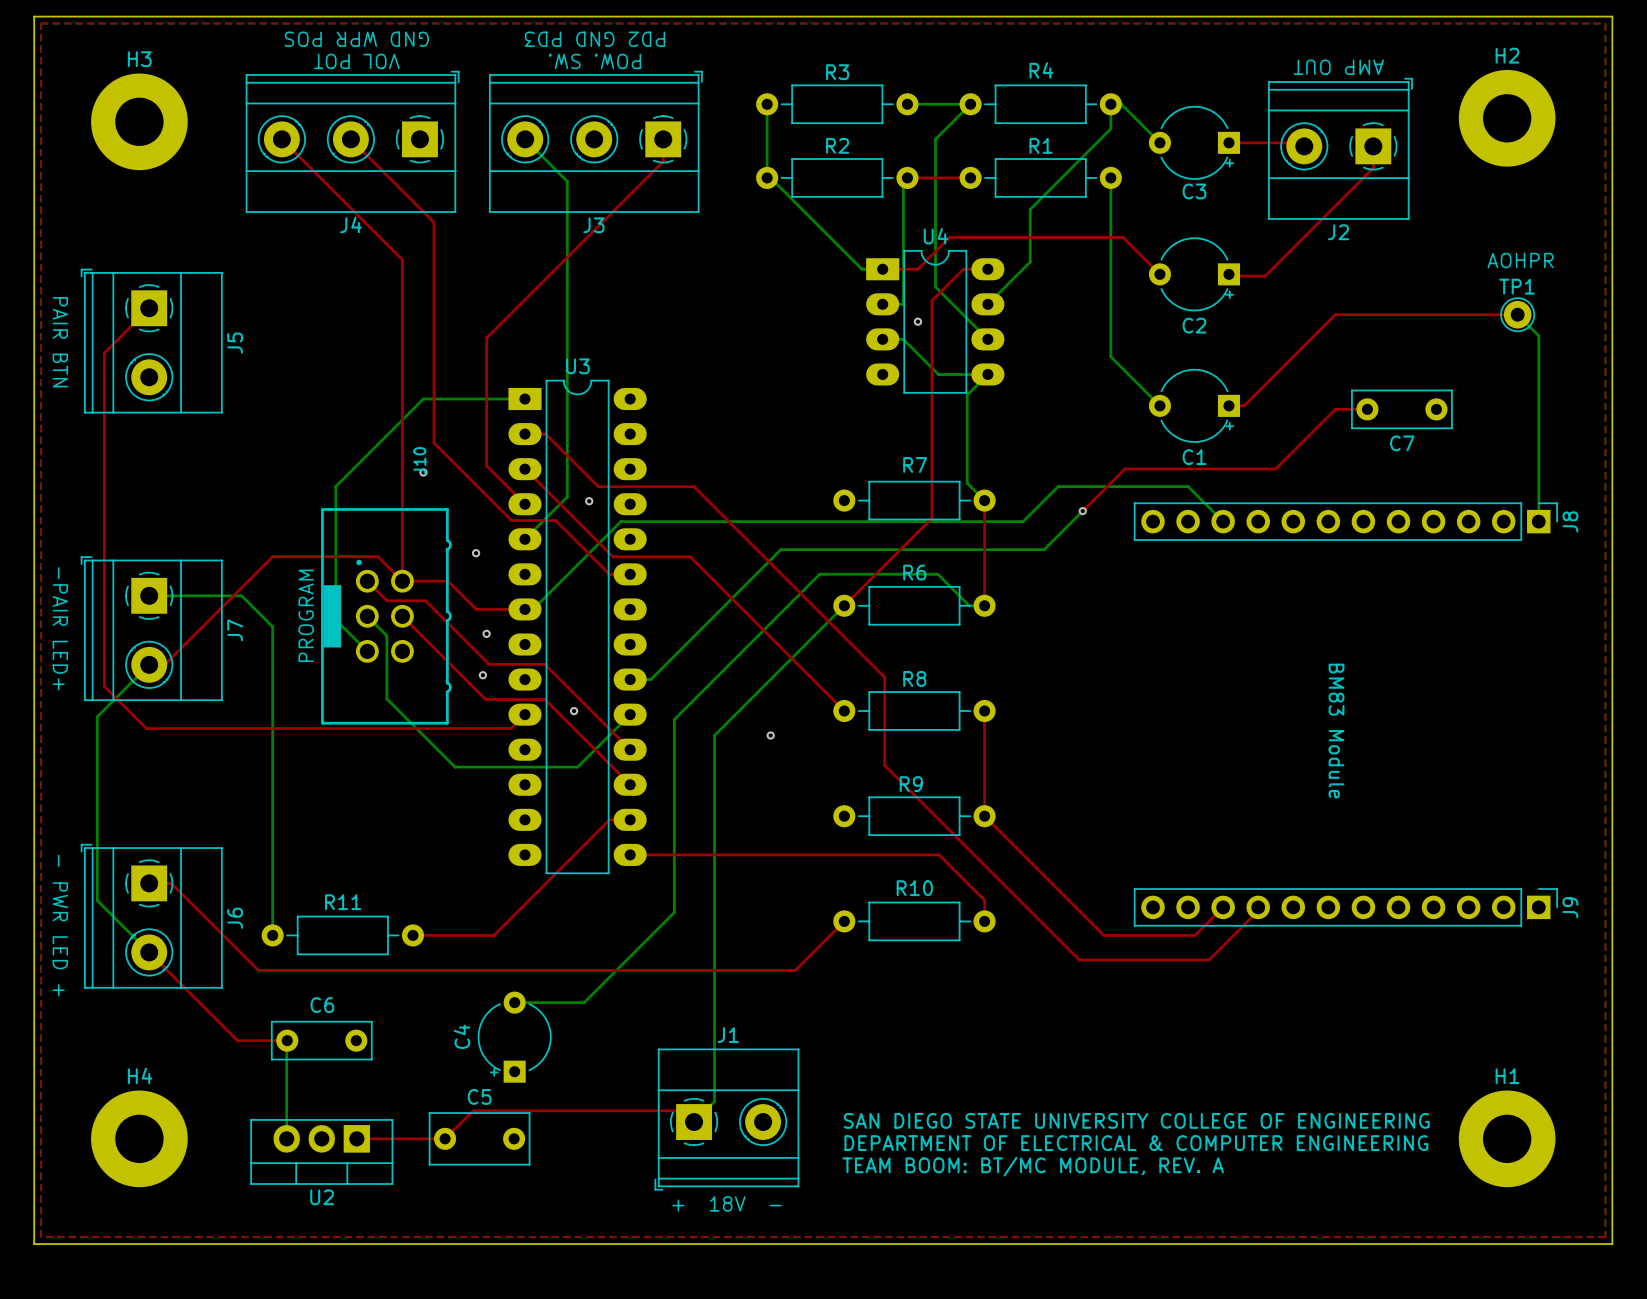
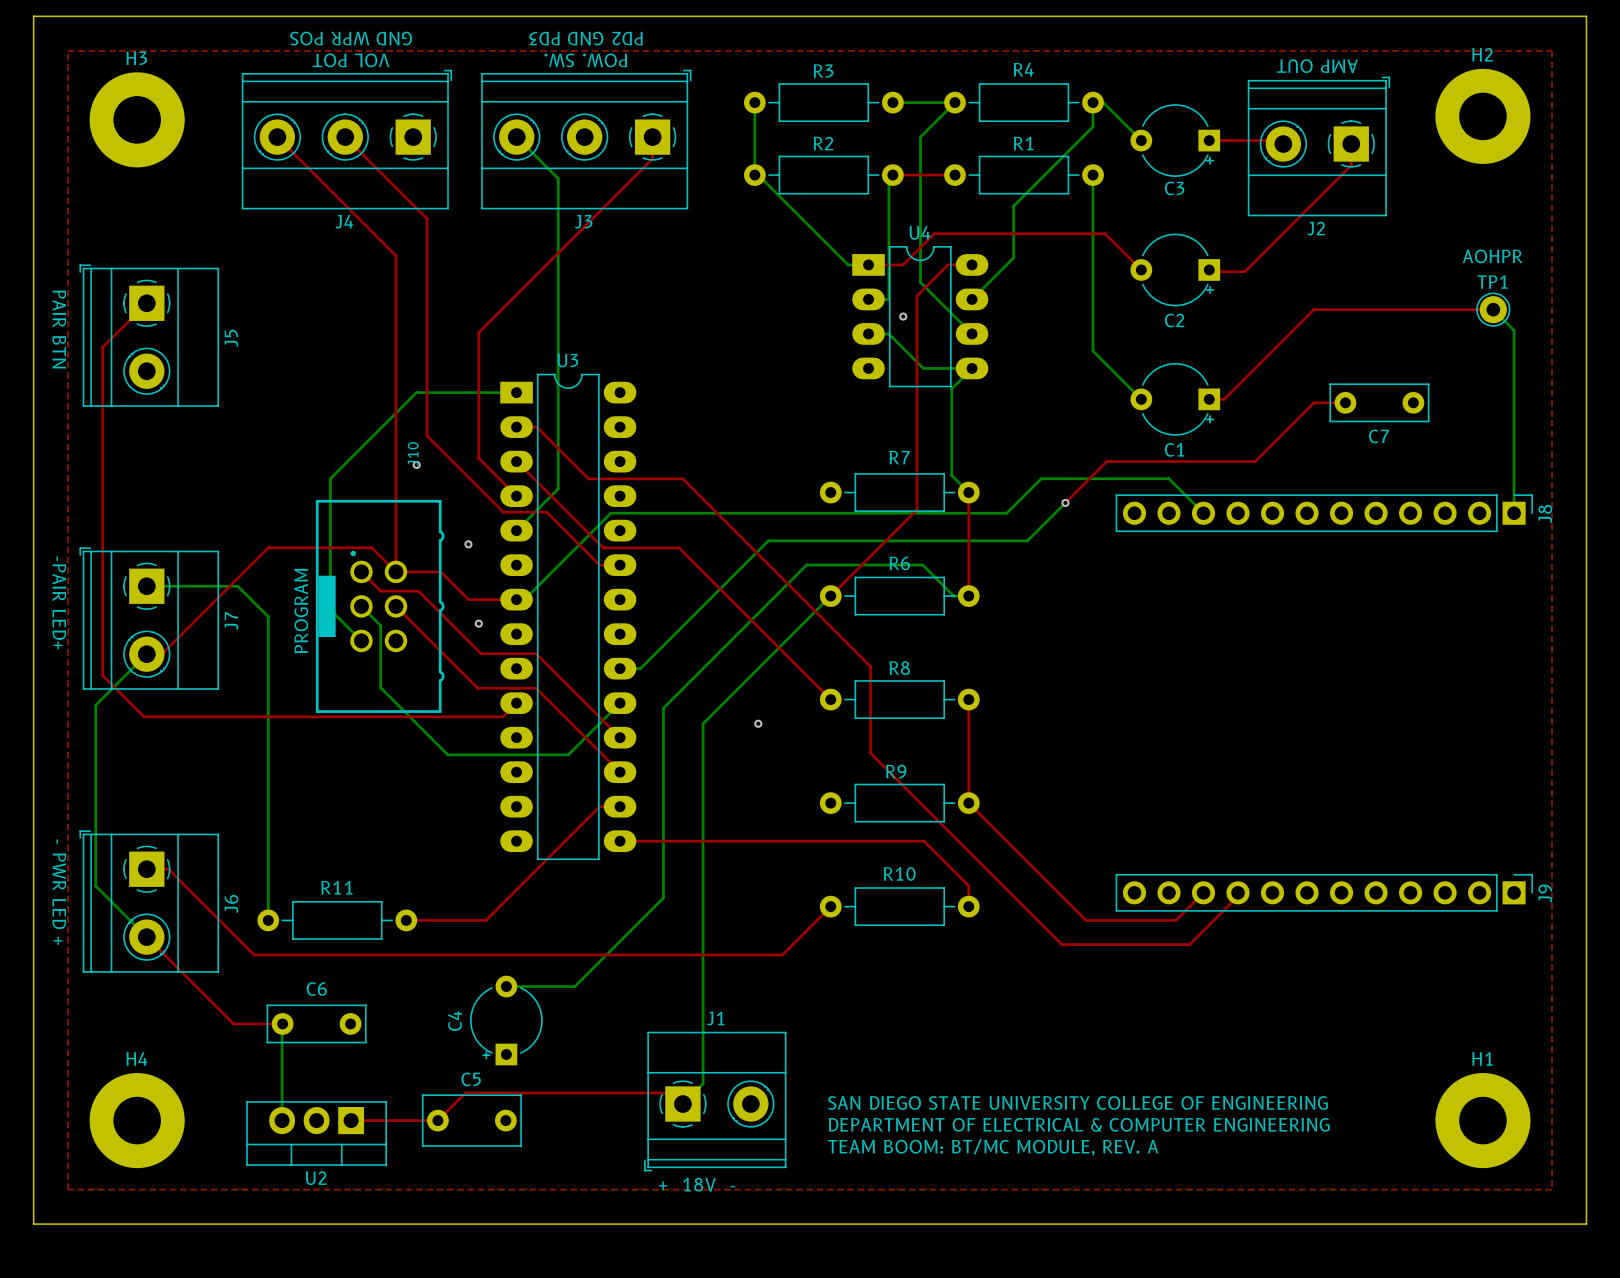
top zone outline: (41, 23) (1605, 23) (1605, 1237) (41, 1237) (41, 23) -> (68, 50) (68, 1189) (1551, 1189) (1551, 50) (68, 50)
via: (589, 501) -> none
via: (482, 675) -> none
via: (574, 711) -> none
text: BM83 Module (1336, 731) -> none

